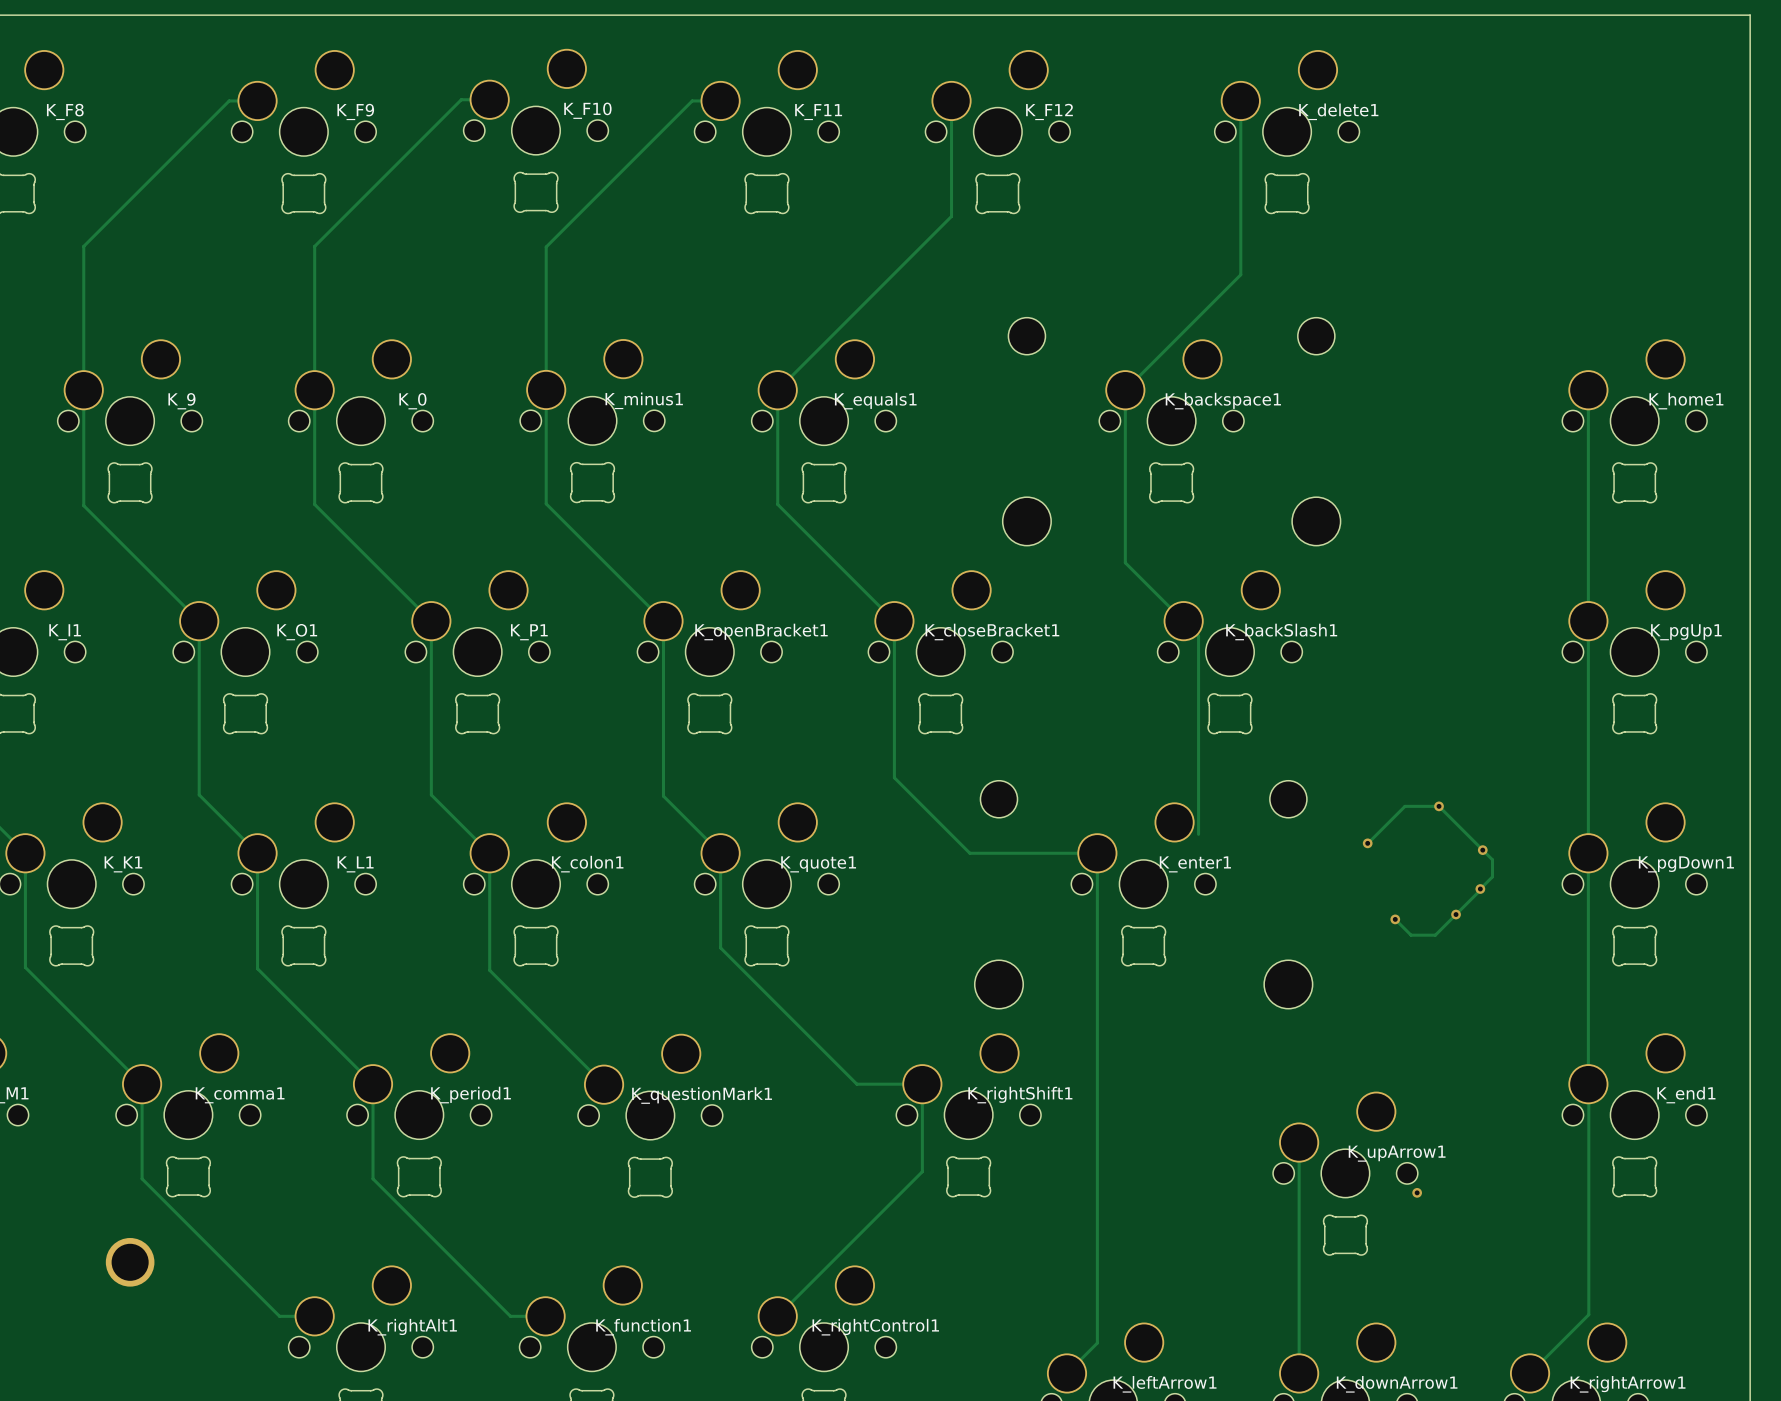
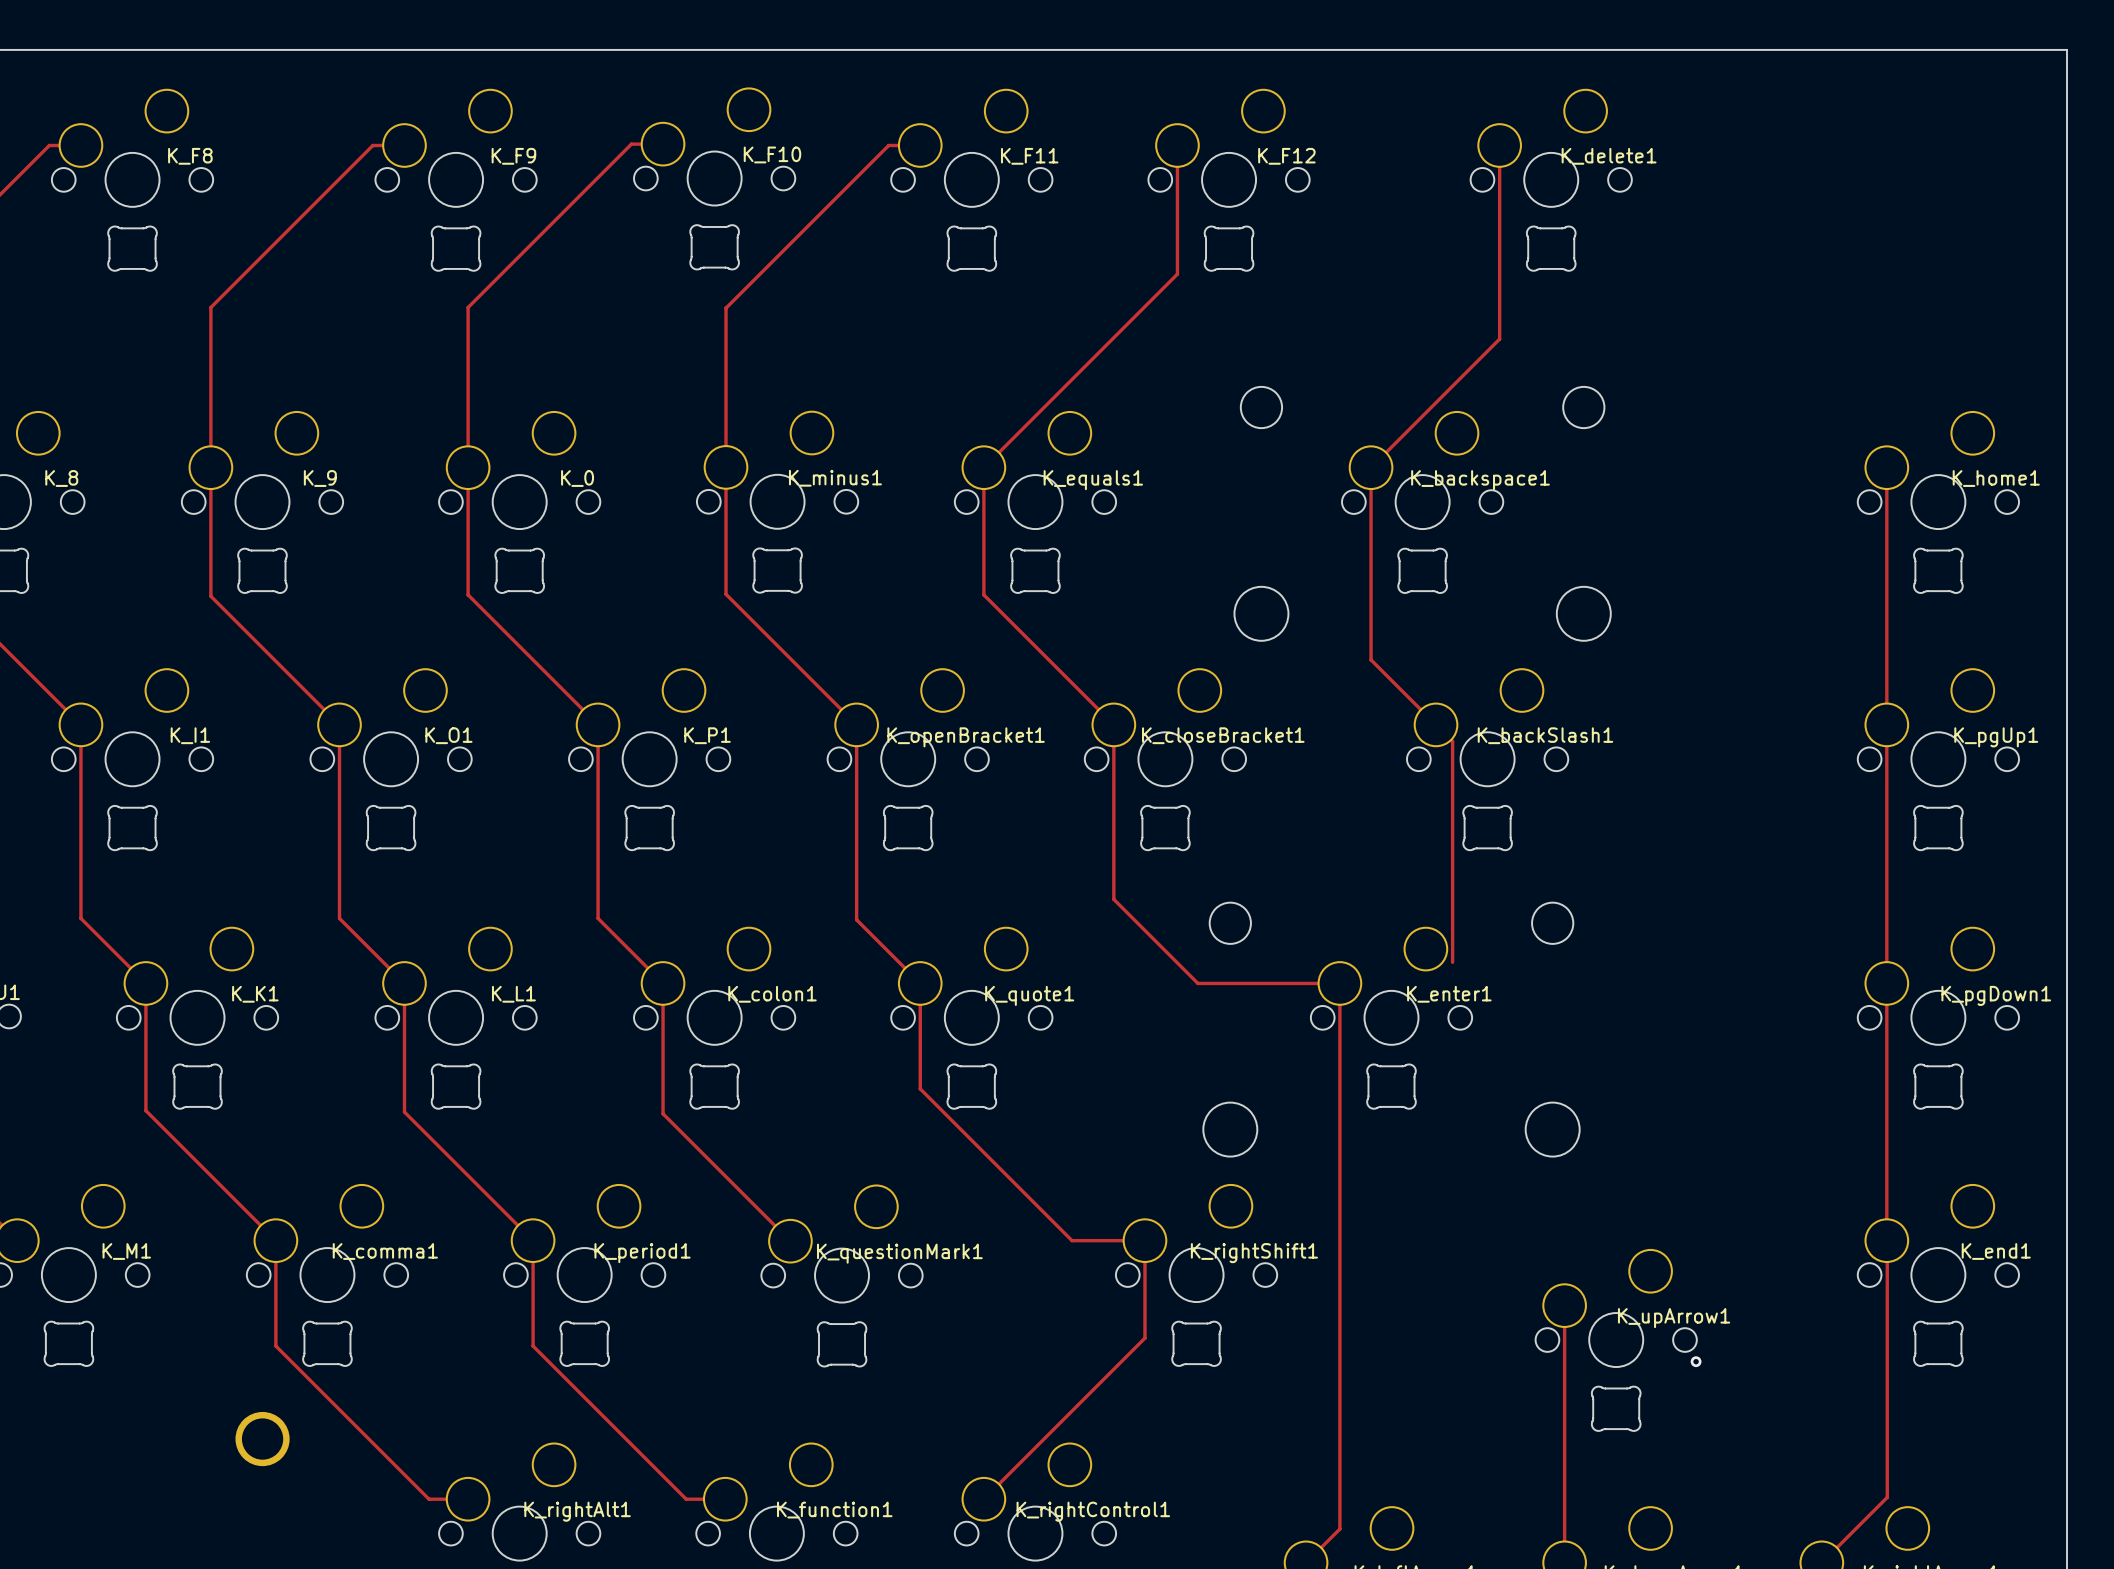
via: (1439, 806) -> none
track: (1367, 843) (1404, 806) (1439, 806) (1492, 859) (1492, 876) (1435, 935) (1411, 935) (1395, 919) -> none
via: (1367, 843) -> none
via: (1482, 850) -> none
via: (1480, 889) -> none
via: (1456, 914) -> none
via: (1395, 919) -> none

